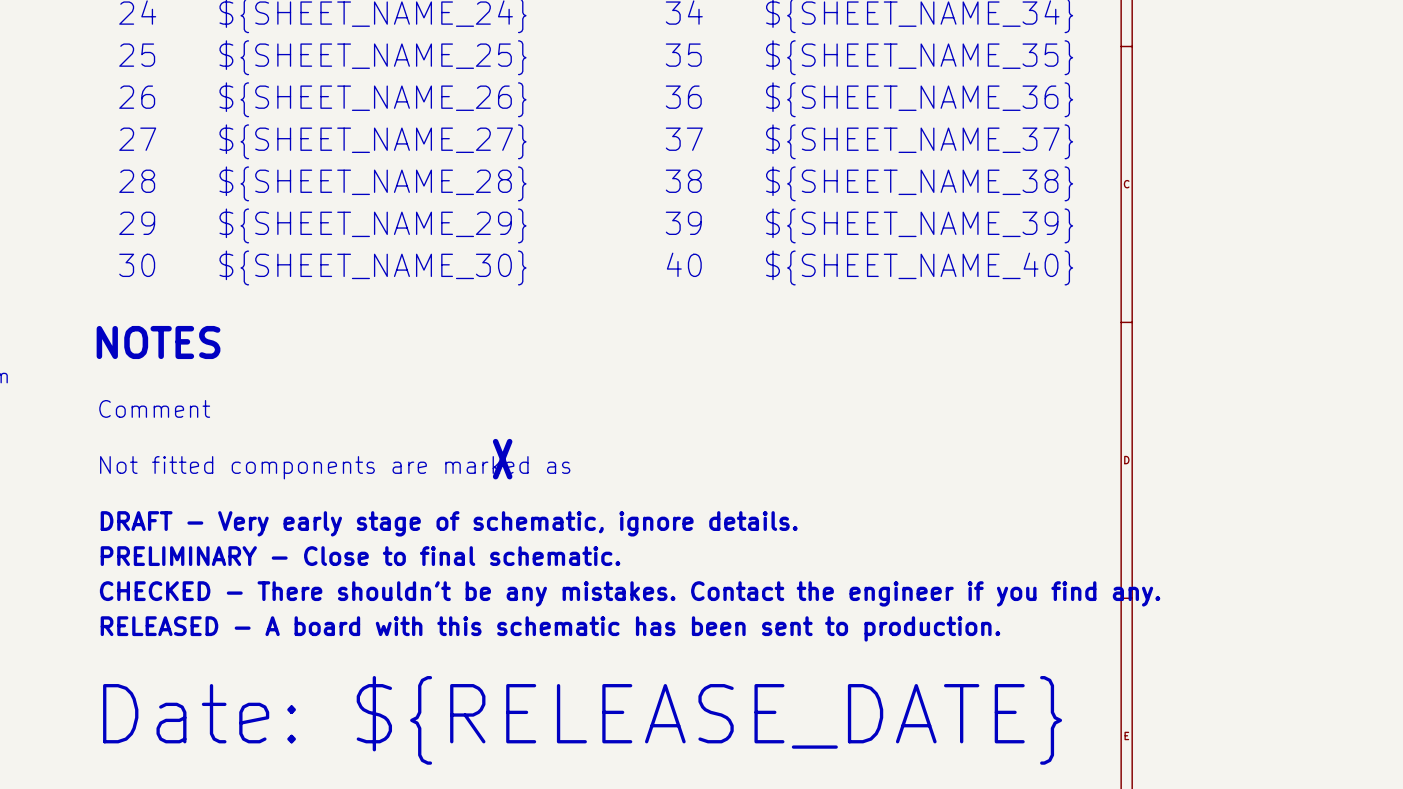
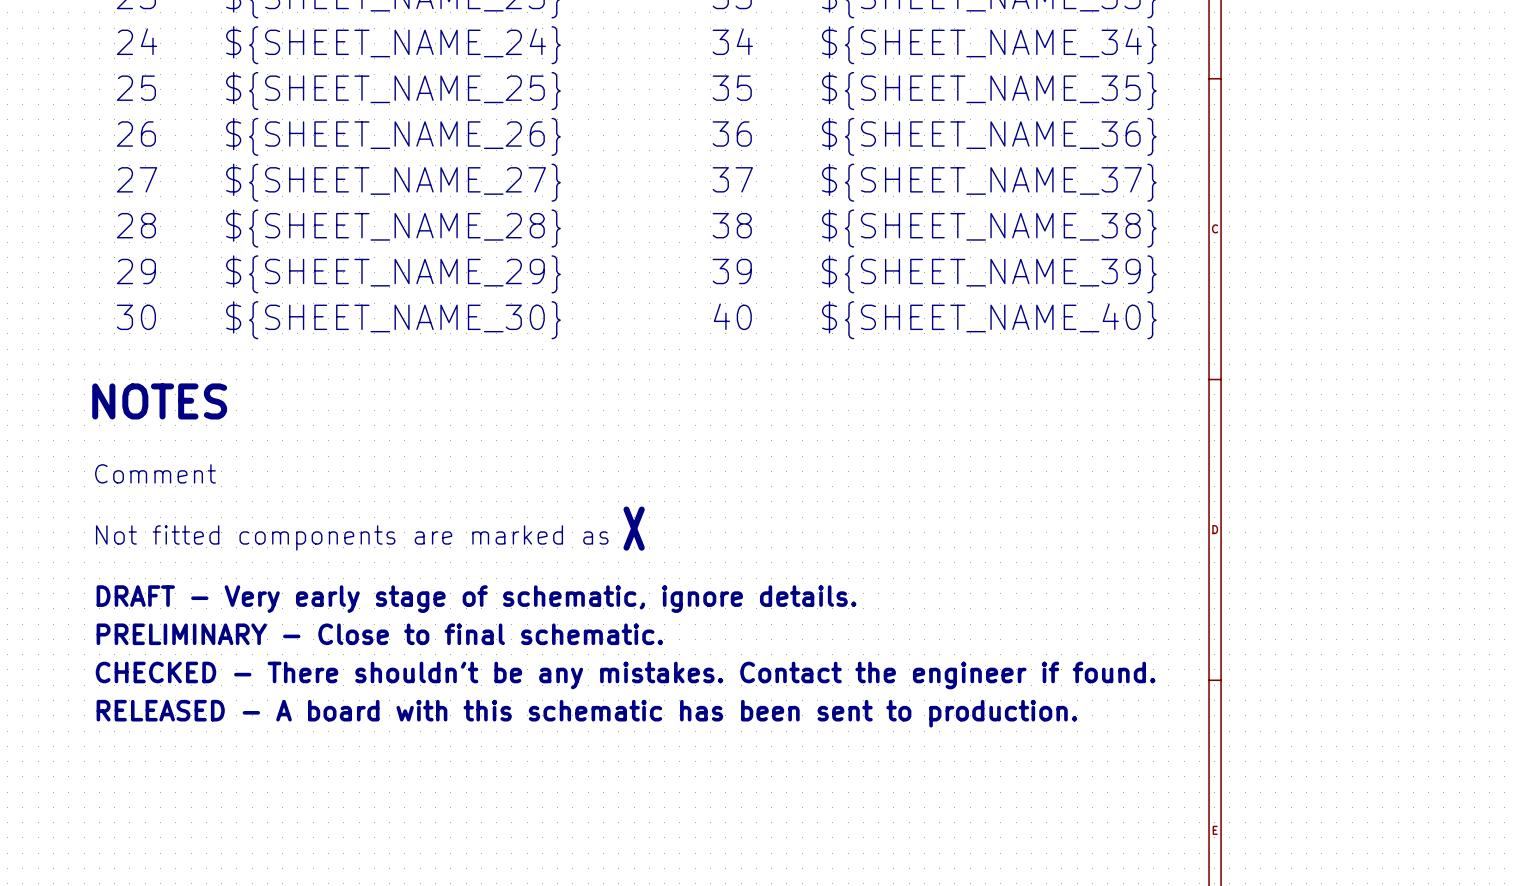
line: (495, 441) (509, 476) -> (626, 509) (641, 547)
line: (509, 441) (495, 476) -> (641, 509) (626, 547)
text: CHECKED - There shouldn't be any mistakes. Contact the engineer if you find any. (630, 593) -> CHECKED - There shouldn't be any mistakes. Contact the engineer if found. (625, 675)
text: Date: ${RELEASE_DATE} (582, 720) -> none

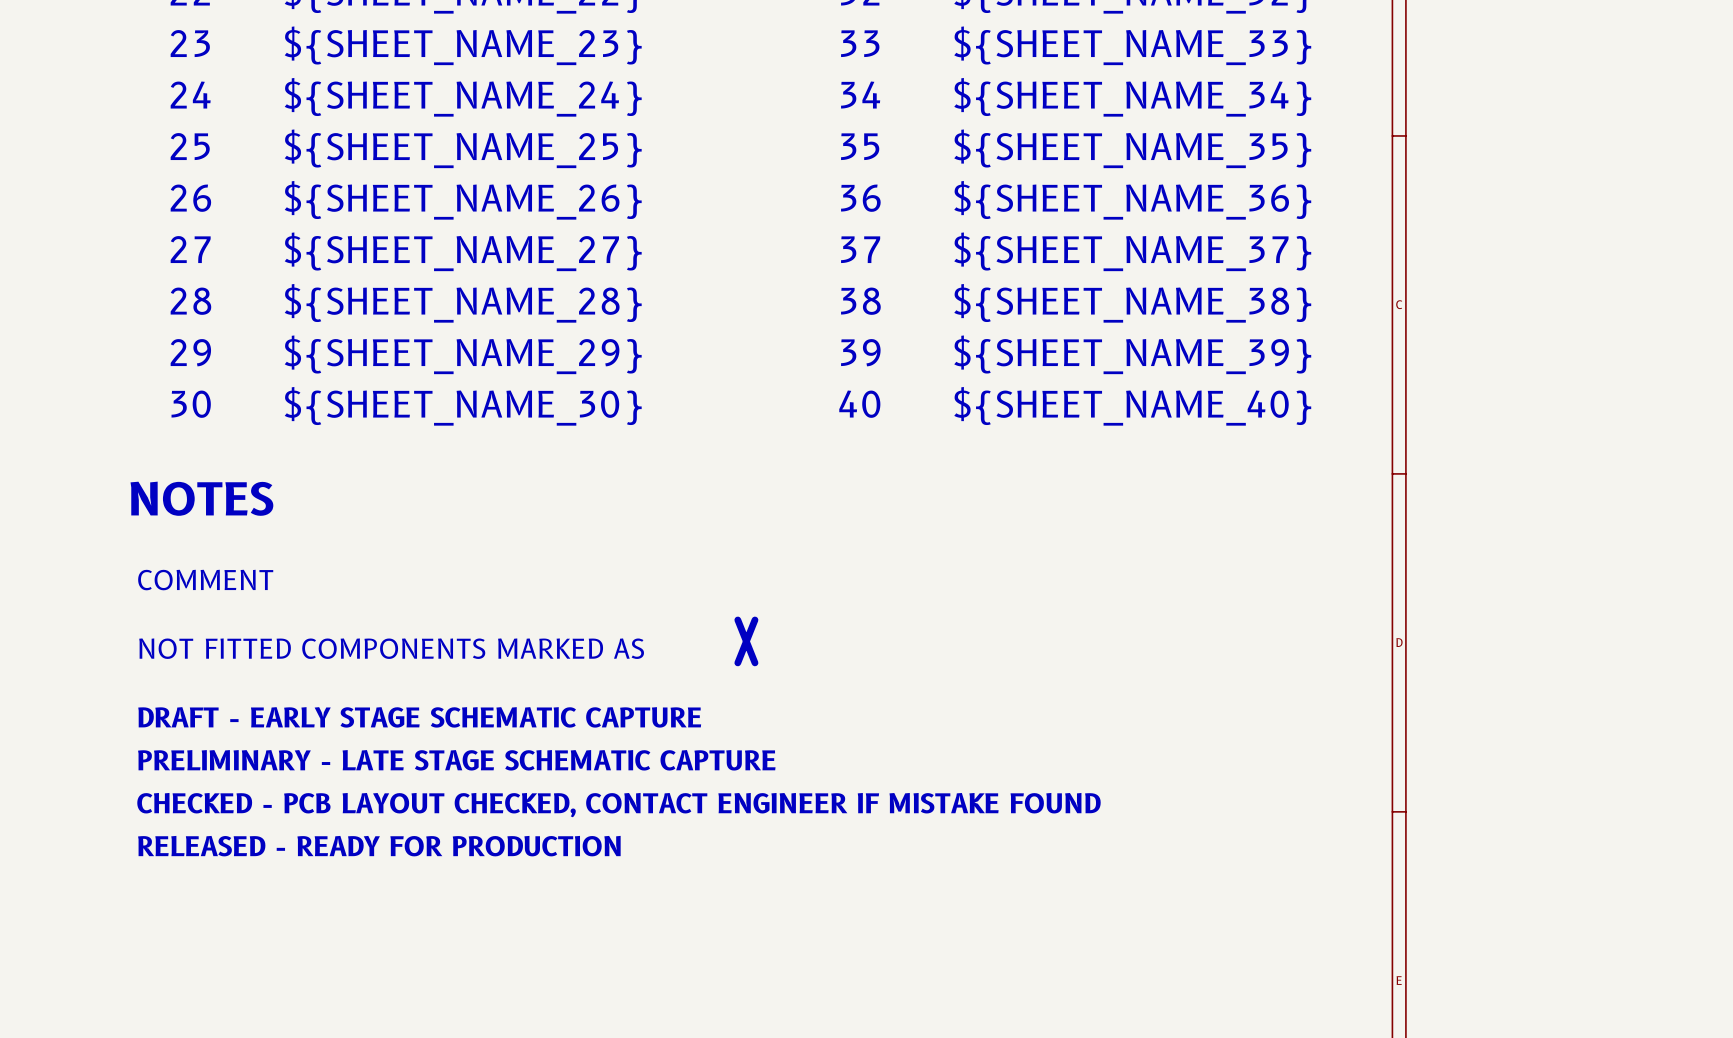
text: Comment (155, 473) -> COMMENT (205, 580)
text: Not fitted components are marked as (352, 537) -> NOT FITTED COMPONENTS MARKED AS (391, 648)
text: DRAFT - Very early stage of schematic, ignore details. (476, 599) -> DRAFT - EARLY STAGE SCHEMATIC CAPTURE (419, 717)
text: PRELIMINARY - Close to final schematic. (379, 634) -> PRELIMINARY - LATE STAGE SCHEMATIC CAPTURE (456, 760)
text: CHECKED - There shouldn't be any mistakes. Contact the engineer if found. (625, 675) -> CHECKED - PCB LAYOUT CHECKED, CONTACT ENGINEER IF MISTAKE FOUND (618, 805)
text: RELEASED - A board with this schematic has been sent to production. (586, 713) -> RELEASED - READY FOR PRODUCTION (379, 846)

